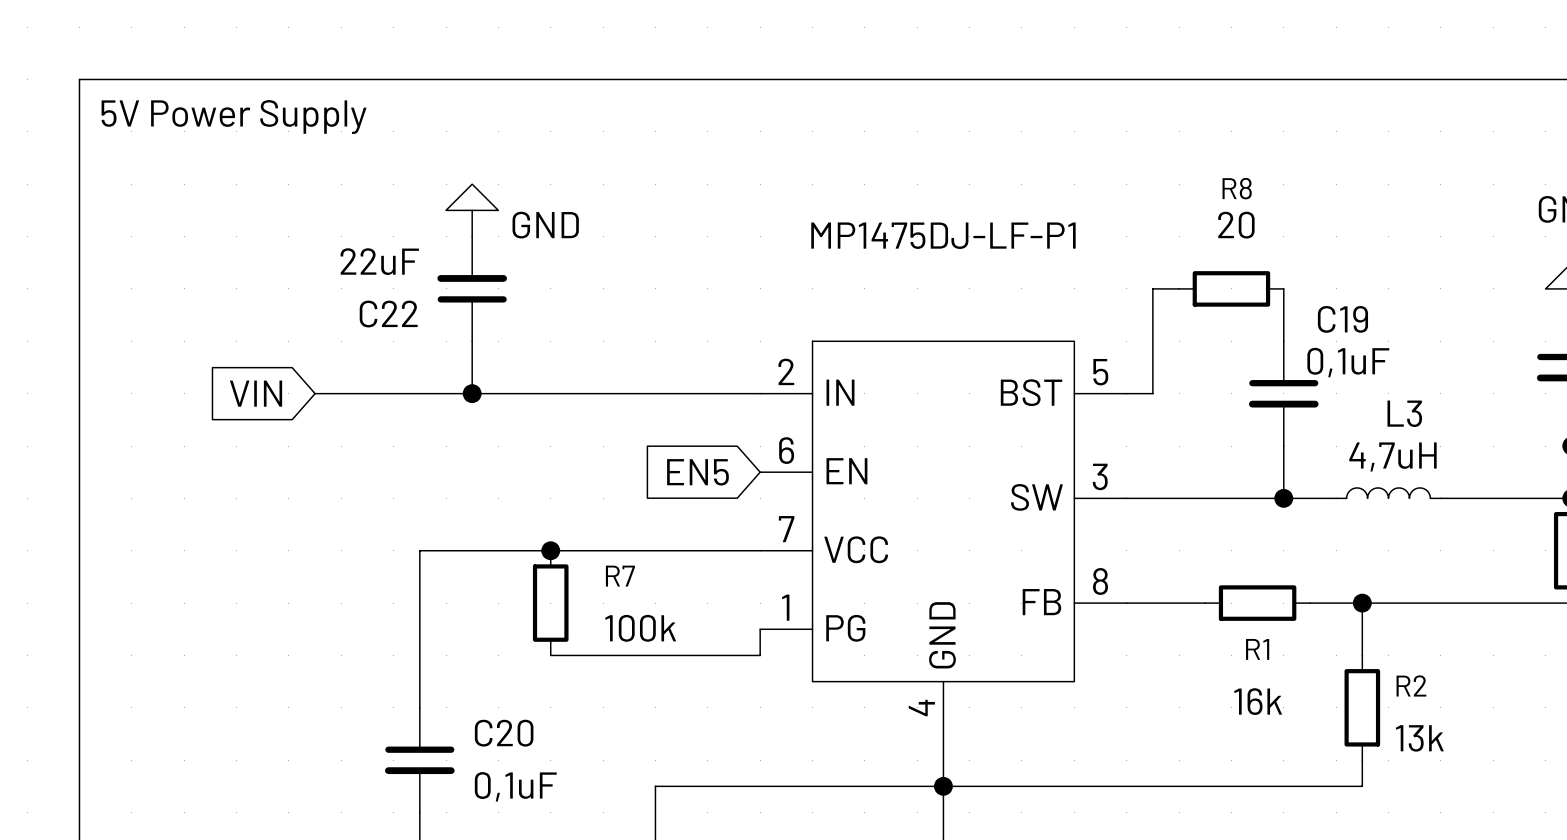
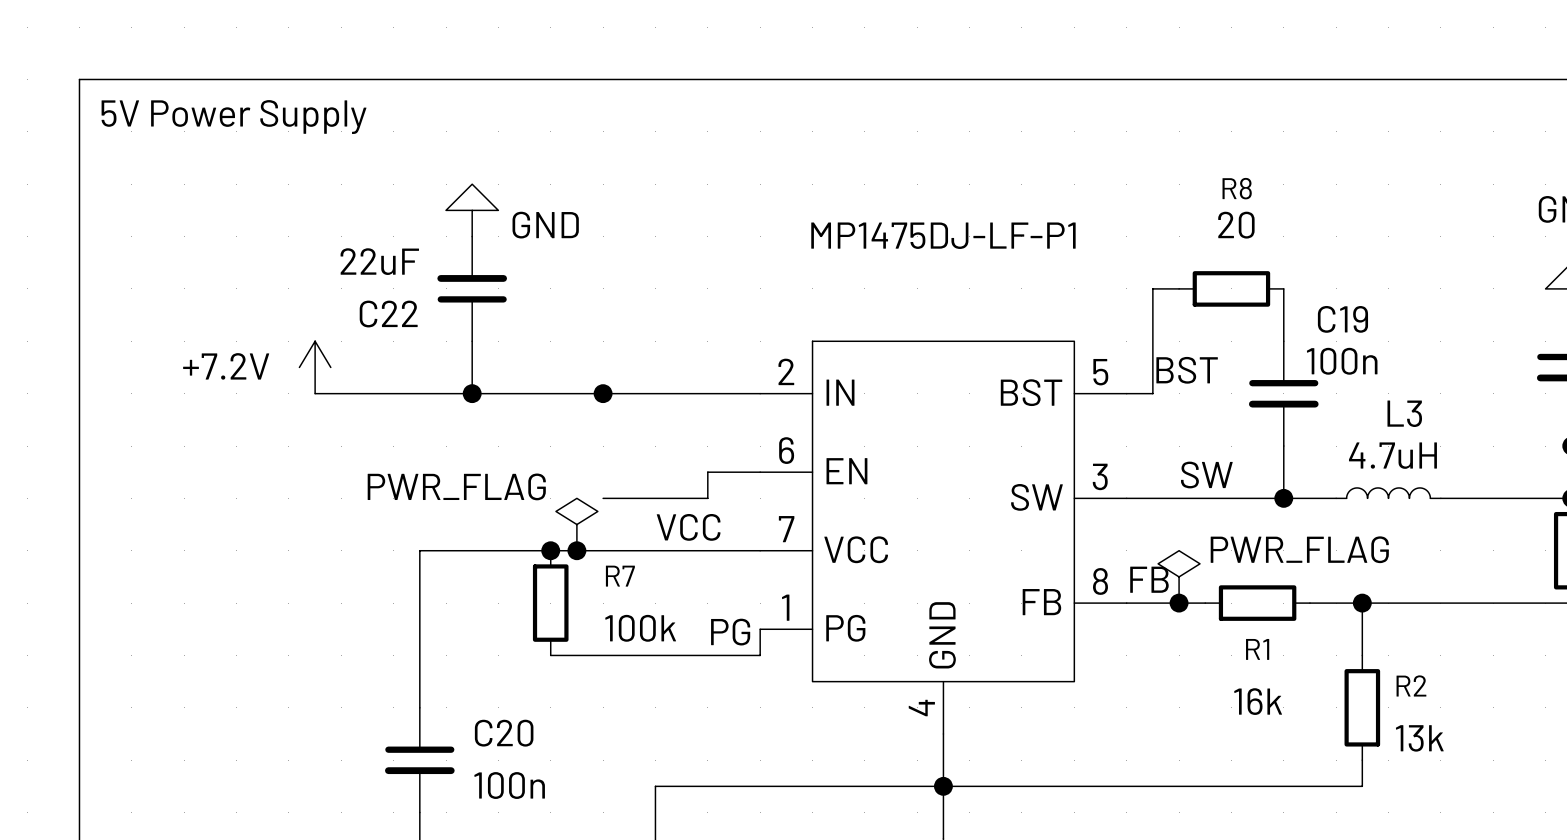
C19 value: 0,1uF (1348, 362) -> 100n (1342, 361)
power symbol: none -> +7.2V (315, 367)
label: none -> BST (1187, 370)
global label: VIN (256, 393) -> none
junction: none -> (603, 393)
L3 value: 4,7uH (1392, 456) -> 4.7uH (1392, 455)
global label: EN5 (697, 472) -> none
wire: none -> (760, 472) (707, 472) (707, 498) (603, 498)
label: none -> SW (1206, 475)
power symbol: none -> PWR_FLAG (576, 524)
label: none -> VCC (688, 527)
junction: none -> (576, 550)
power symbol: none -> PWR_FLAG (1179, 576)
label: none -> FB (1149, 579)
junction: none -> (1179, 603)
label: none -> PG (730, 632)
C20 value: 0,1uF (515, 786) -> 100n (509, 785)

